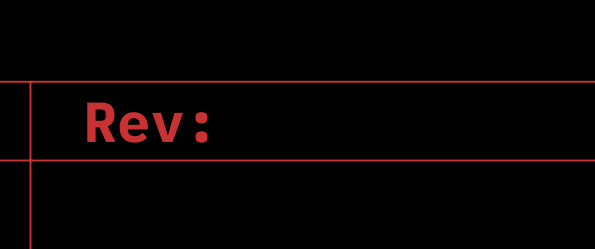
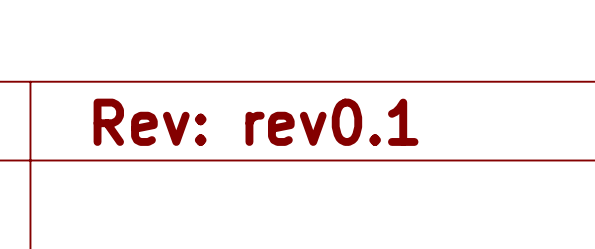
title block: Rev: (147, 122) -> Rev: rev0.1 (256, 122)

